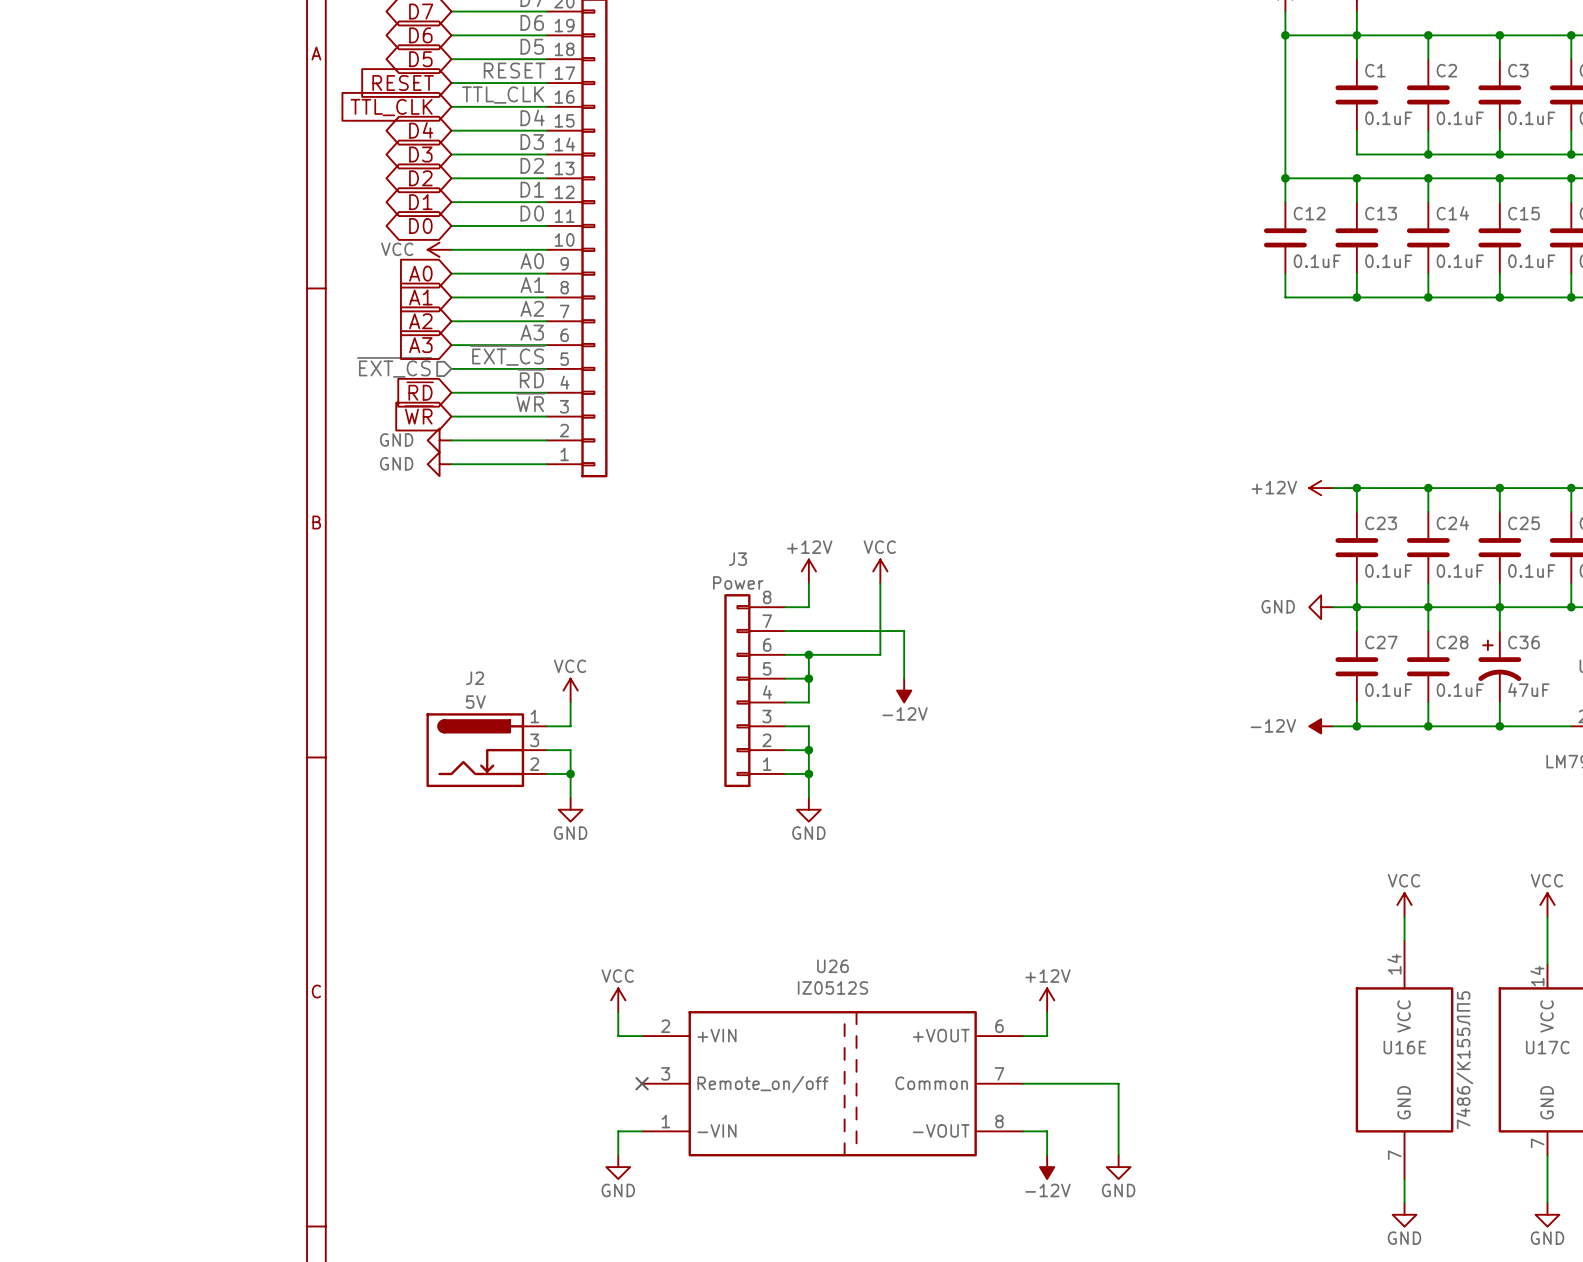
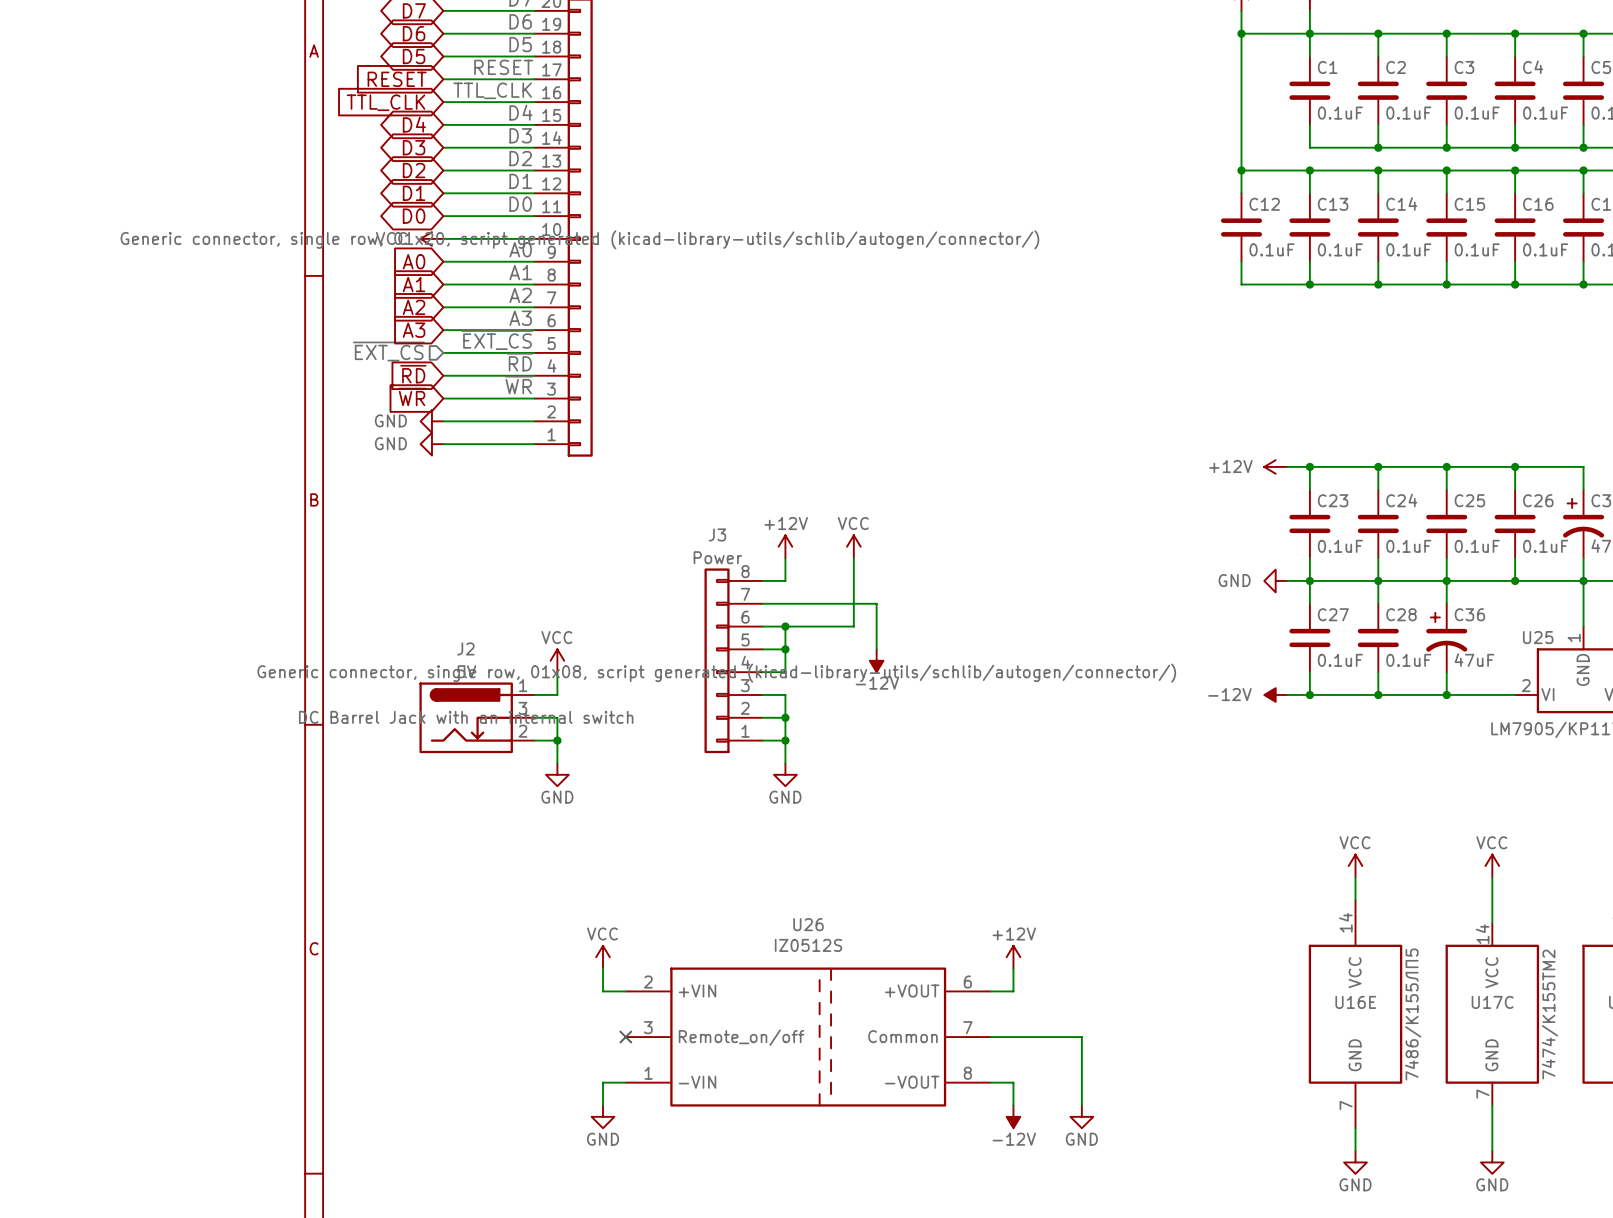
part text: none -> Generic connector, single row, 01x20, script generated (kicad-library-utils/schlib/autogen/connector/) (579, 239)
J3 text: none -> Generic connector, single row, 01x08, script generated (kicad-library-utils/schlib/autogen/connector/) (716, 673)
J2 text: none -> DC Barrel Jack with an internal switch (466, 717)

